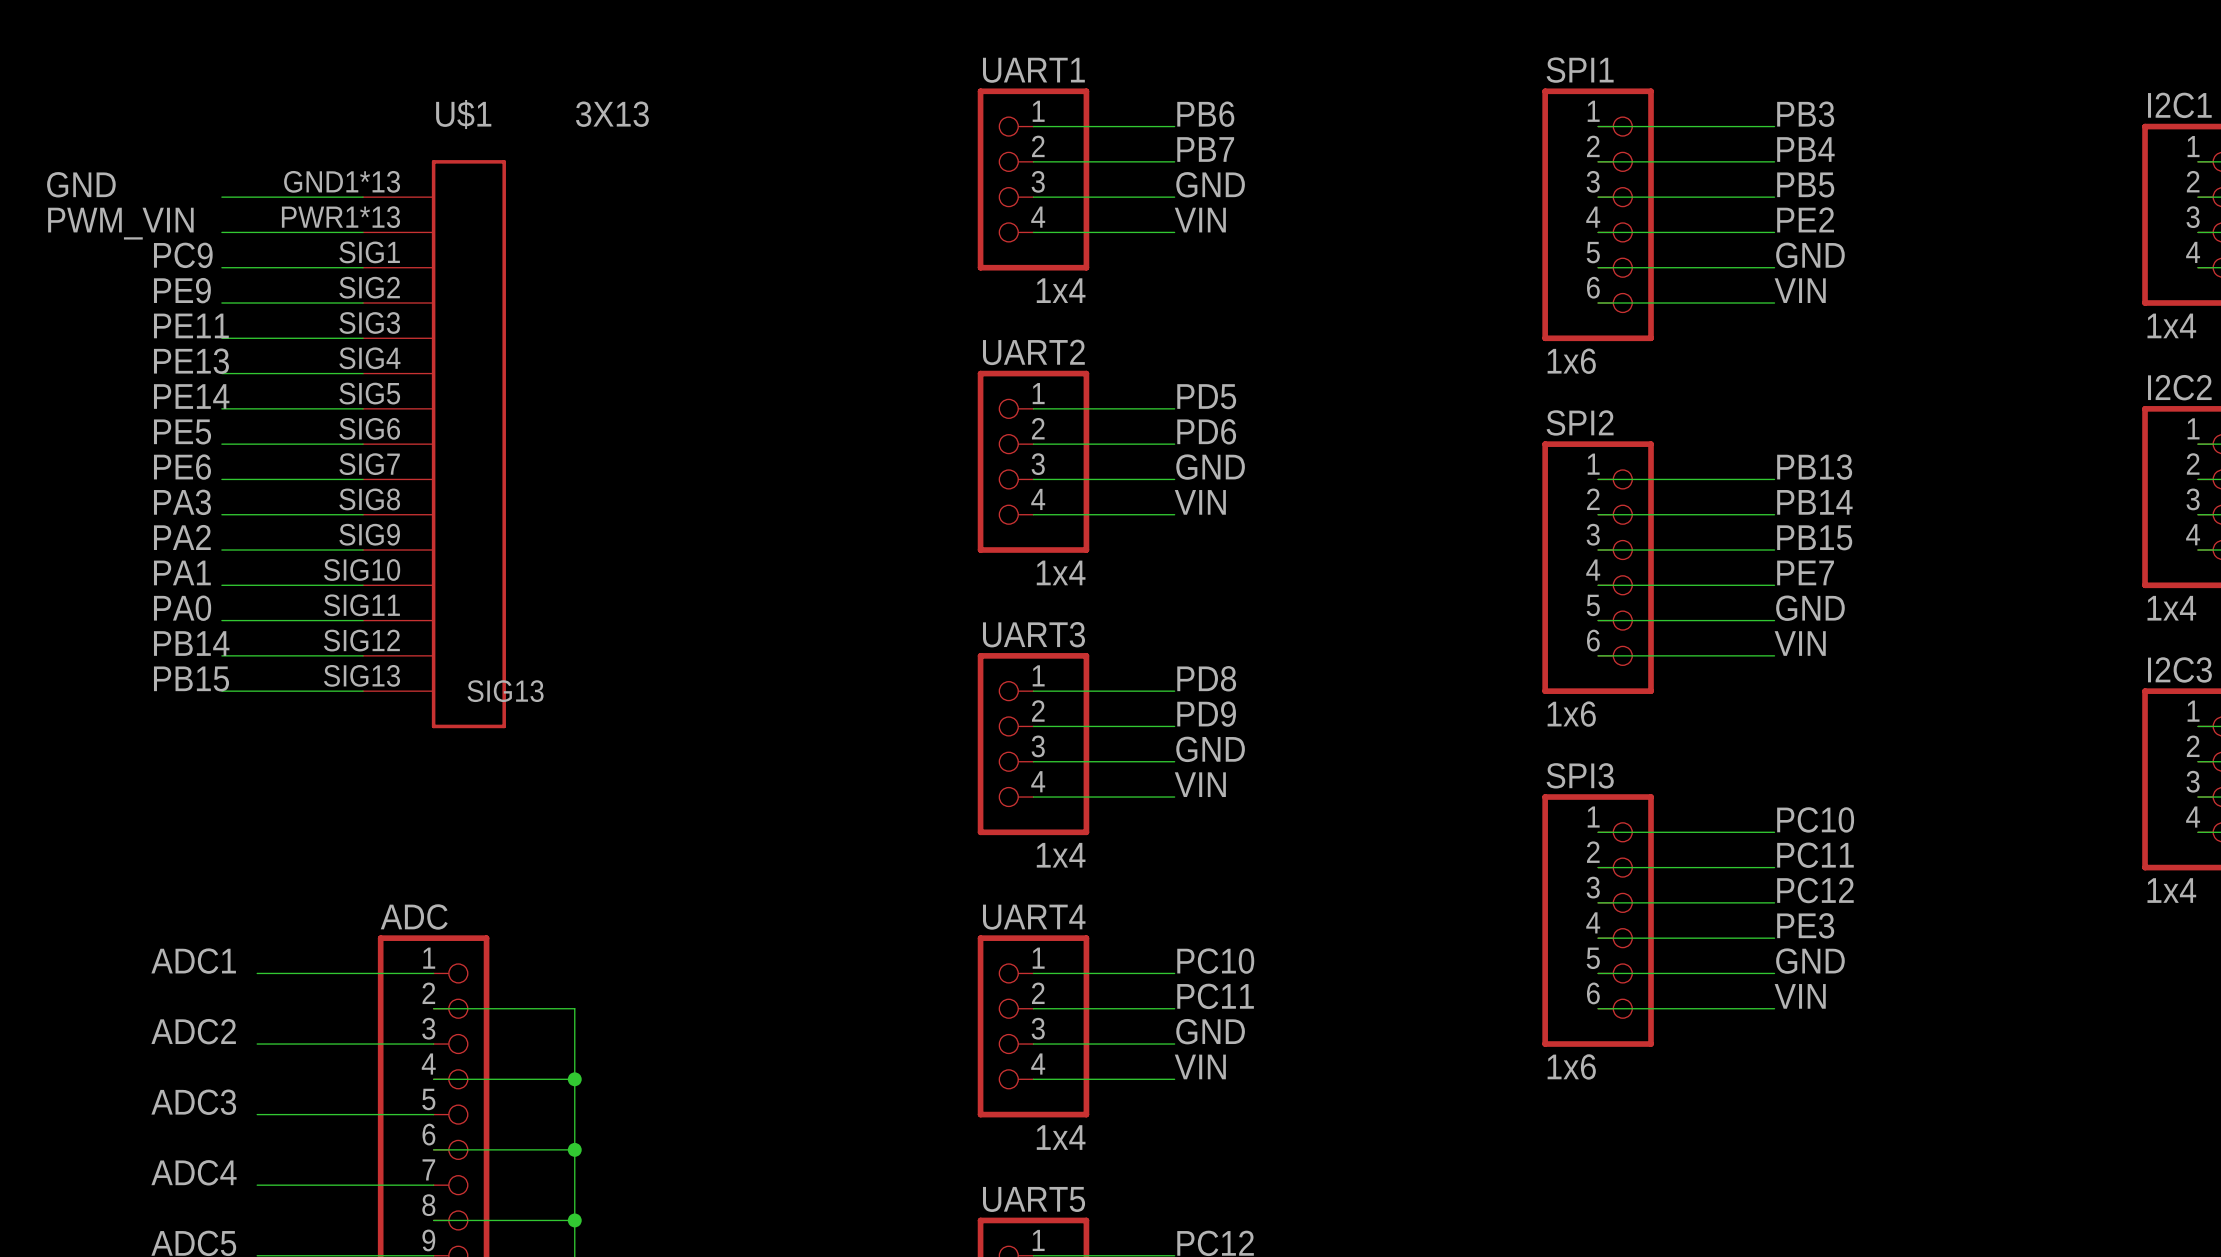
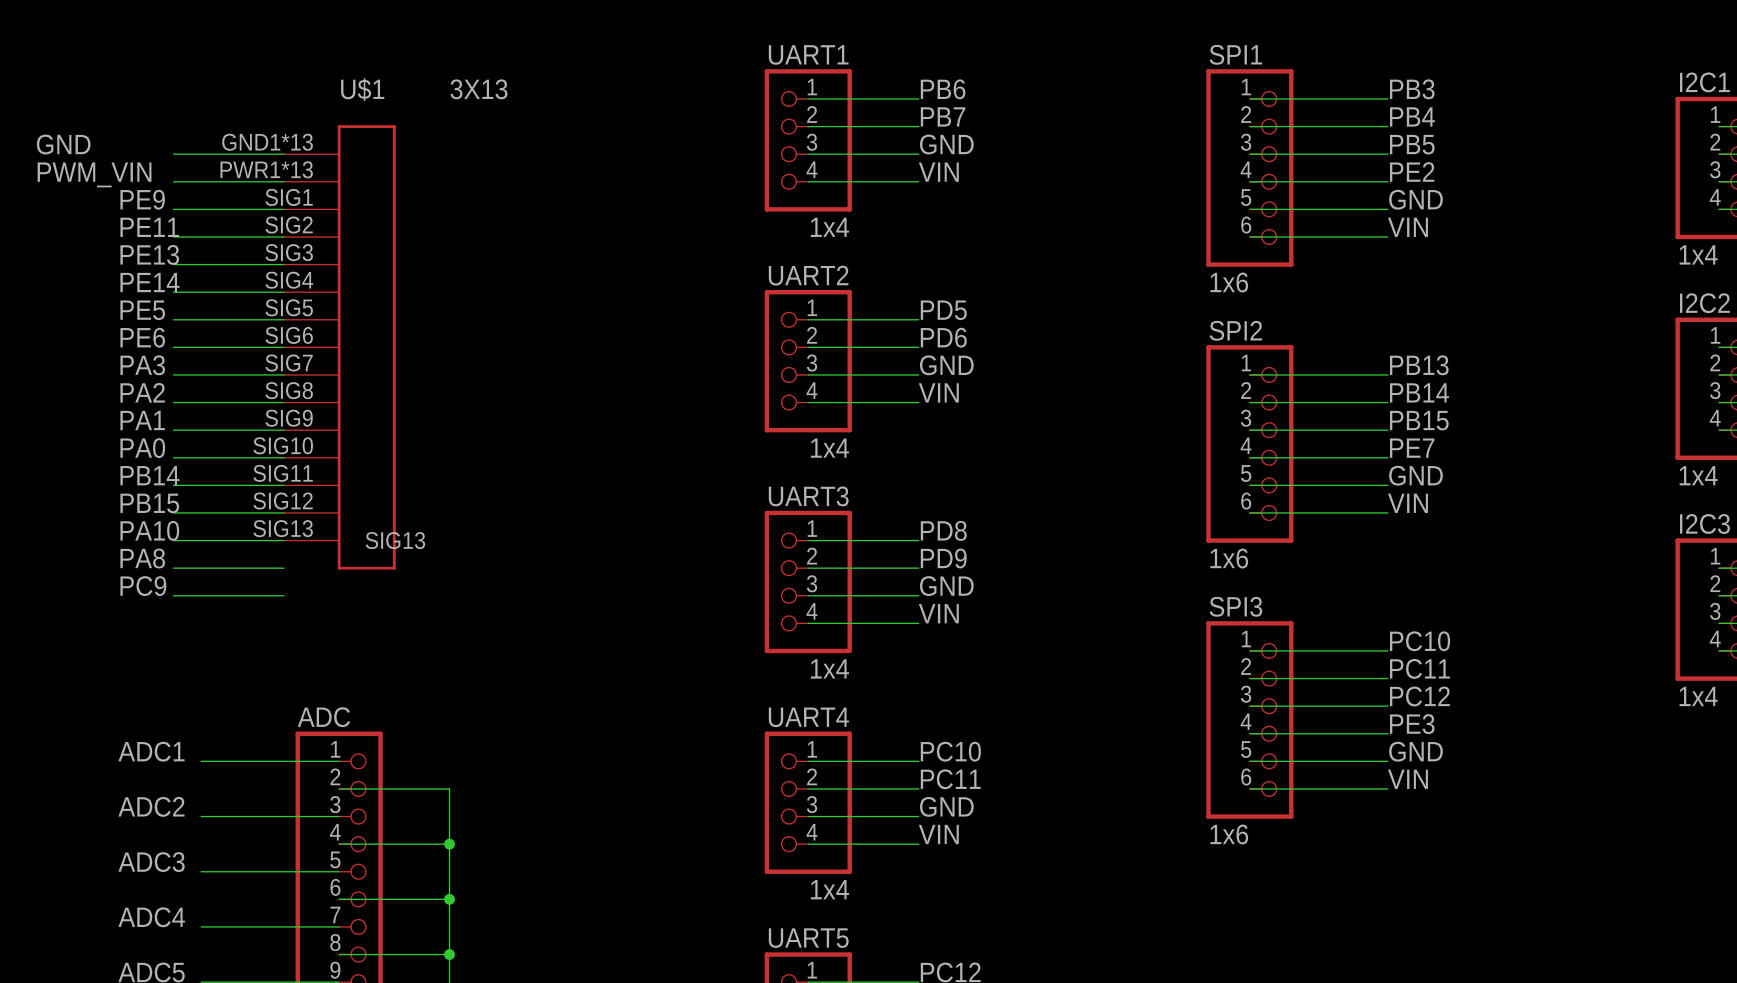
label: PC9 (183, 255) -> PE9 (142, 199)
label: PE9 (182, 290) -> PE11 (149, 227)
label: PE11 (191, 325) -> PE13 (149, 254)
label: PE13 (191, 361) -> PE14 (149, 282)
label: PE14 (191, 396) -> PE5 (142, 310)
label: PE5 (182, 431) -> PE6 (142, 337)
label: PE6 (182, 467) -> PA3 (142, 365)
label: PA3 (182, 502) -> PA2 (142, 392)
label: PA2 (182, 537) -> PA1 (142, 420)
label: PA1 (182, 572) -> PA0 (142, 448)
label: PA0 (182, 608) -> PB14 (149, 475)
label: PB14 (191, 643) -> PB15 (149, 503)
label: PB15 (191, 678) -> PA10 (149, 530)
label: none -> PA8 (142, 558)
wire: none -> (173, 568) (283, 568)
label: none -> PC9 (143, 586)
wire: none -> (173, 595) (283, 595)

